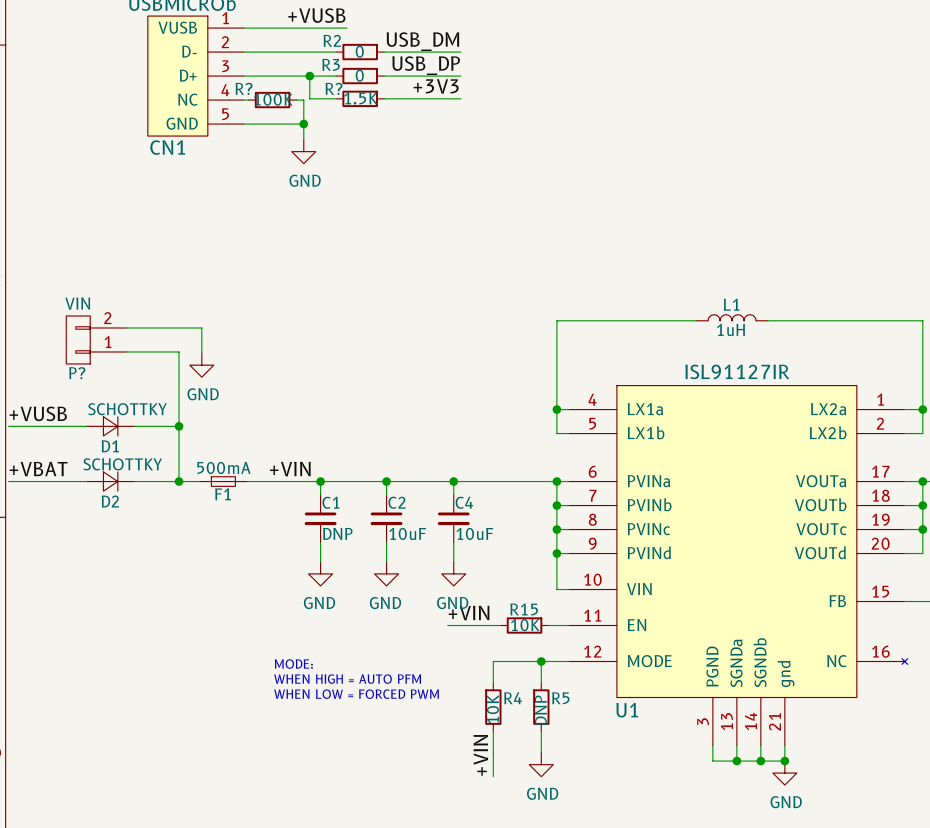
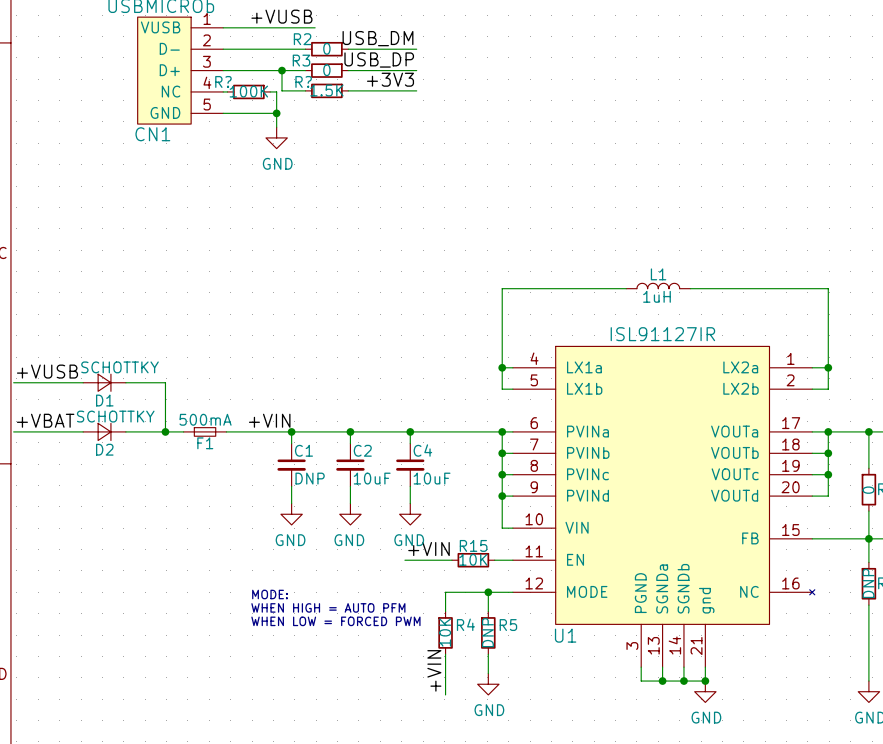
wire: (126, 327) (201, 327) (201, 353) -> none
P?: VIN (96, 339) -> none
wire: (126, 351) (179, 351) (179, 426) -> none
power symbol: GND (201, 365) -> none
junction: (179, 426) -> none

